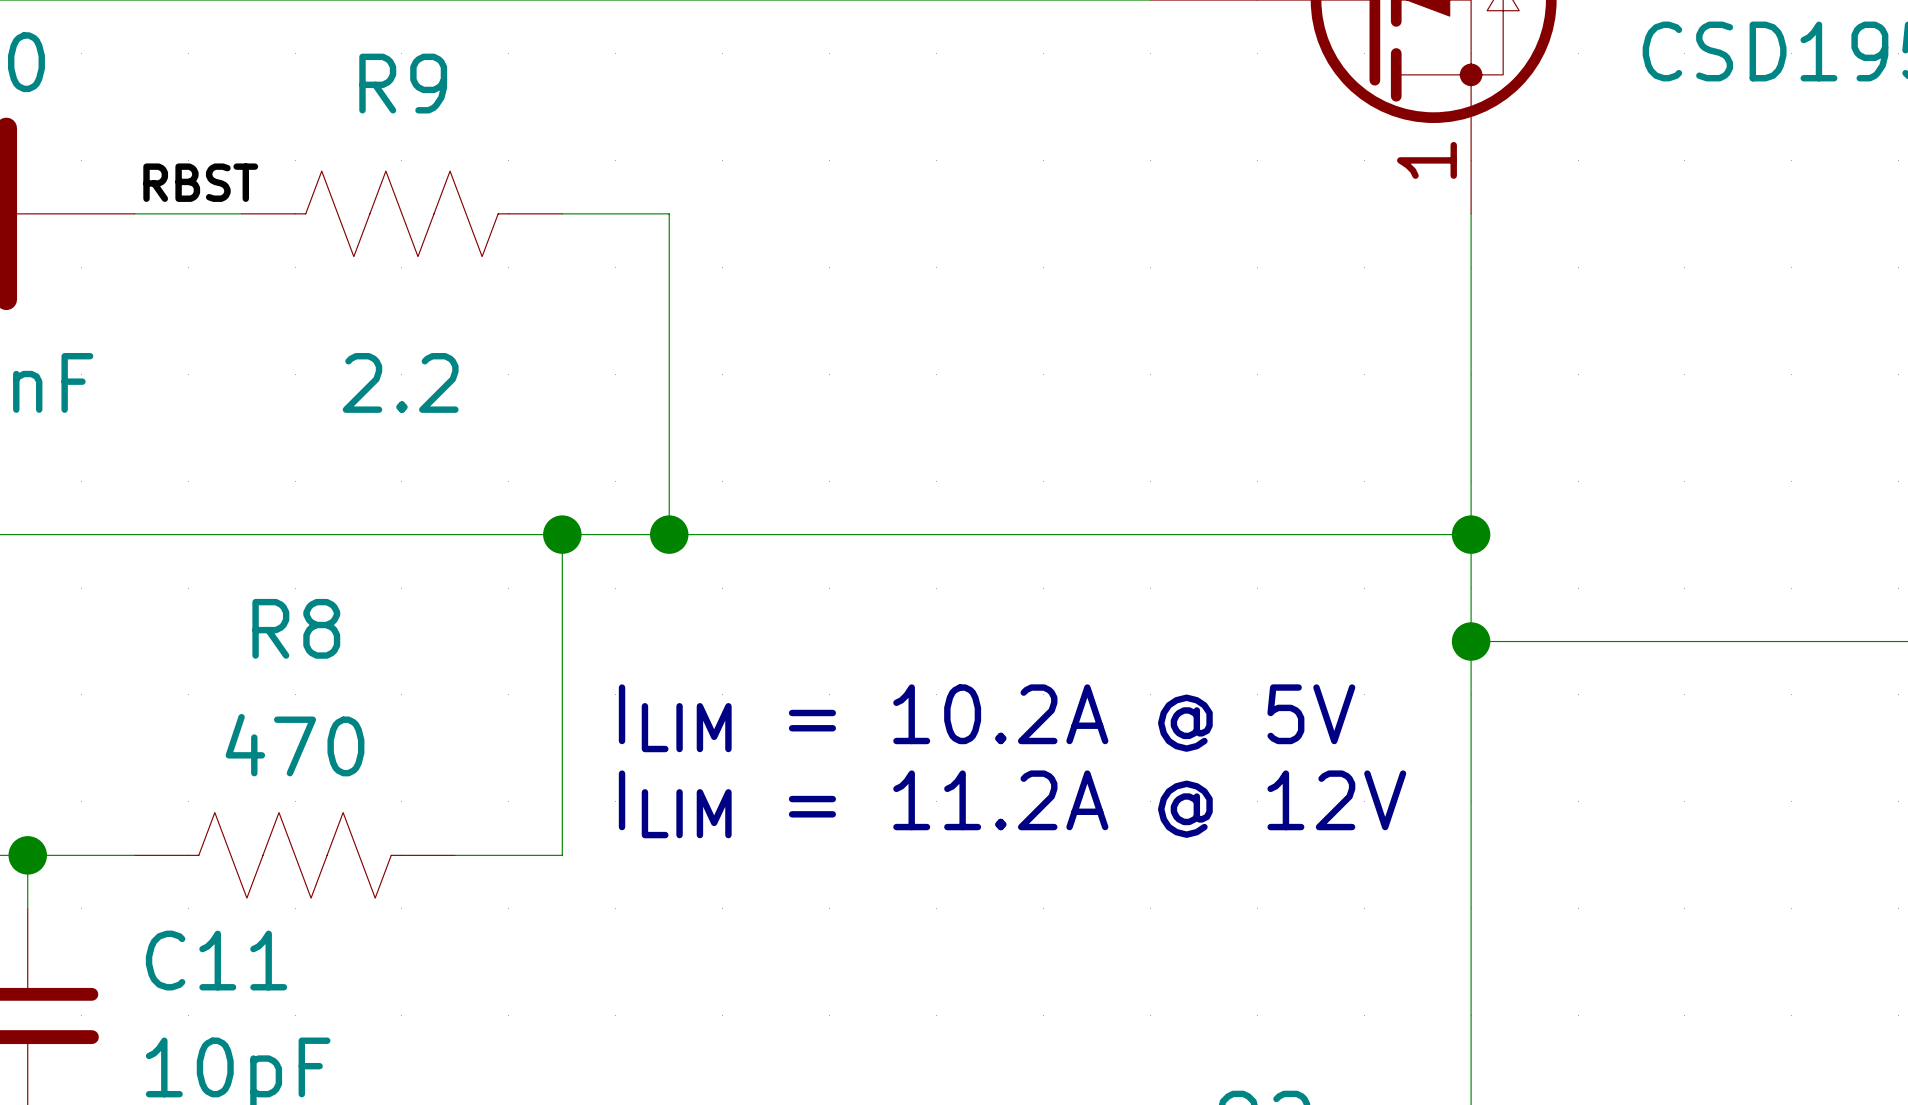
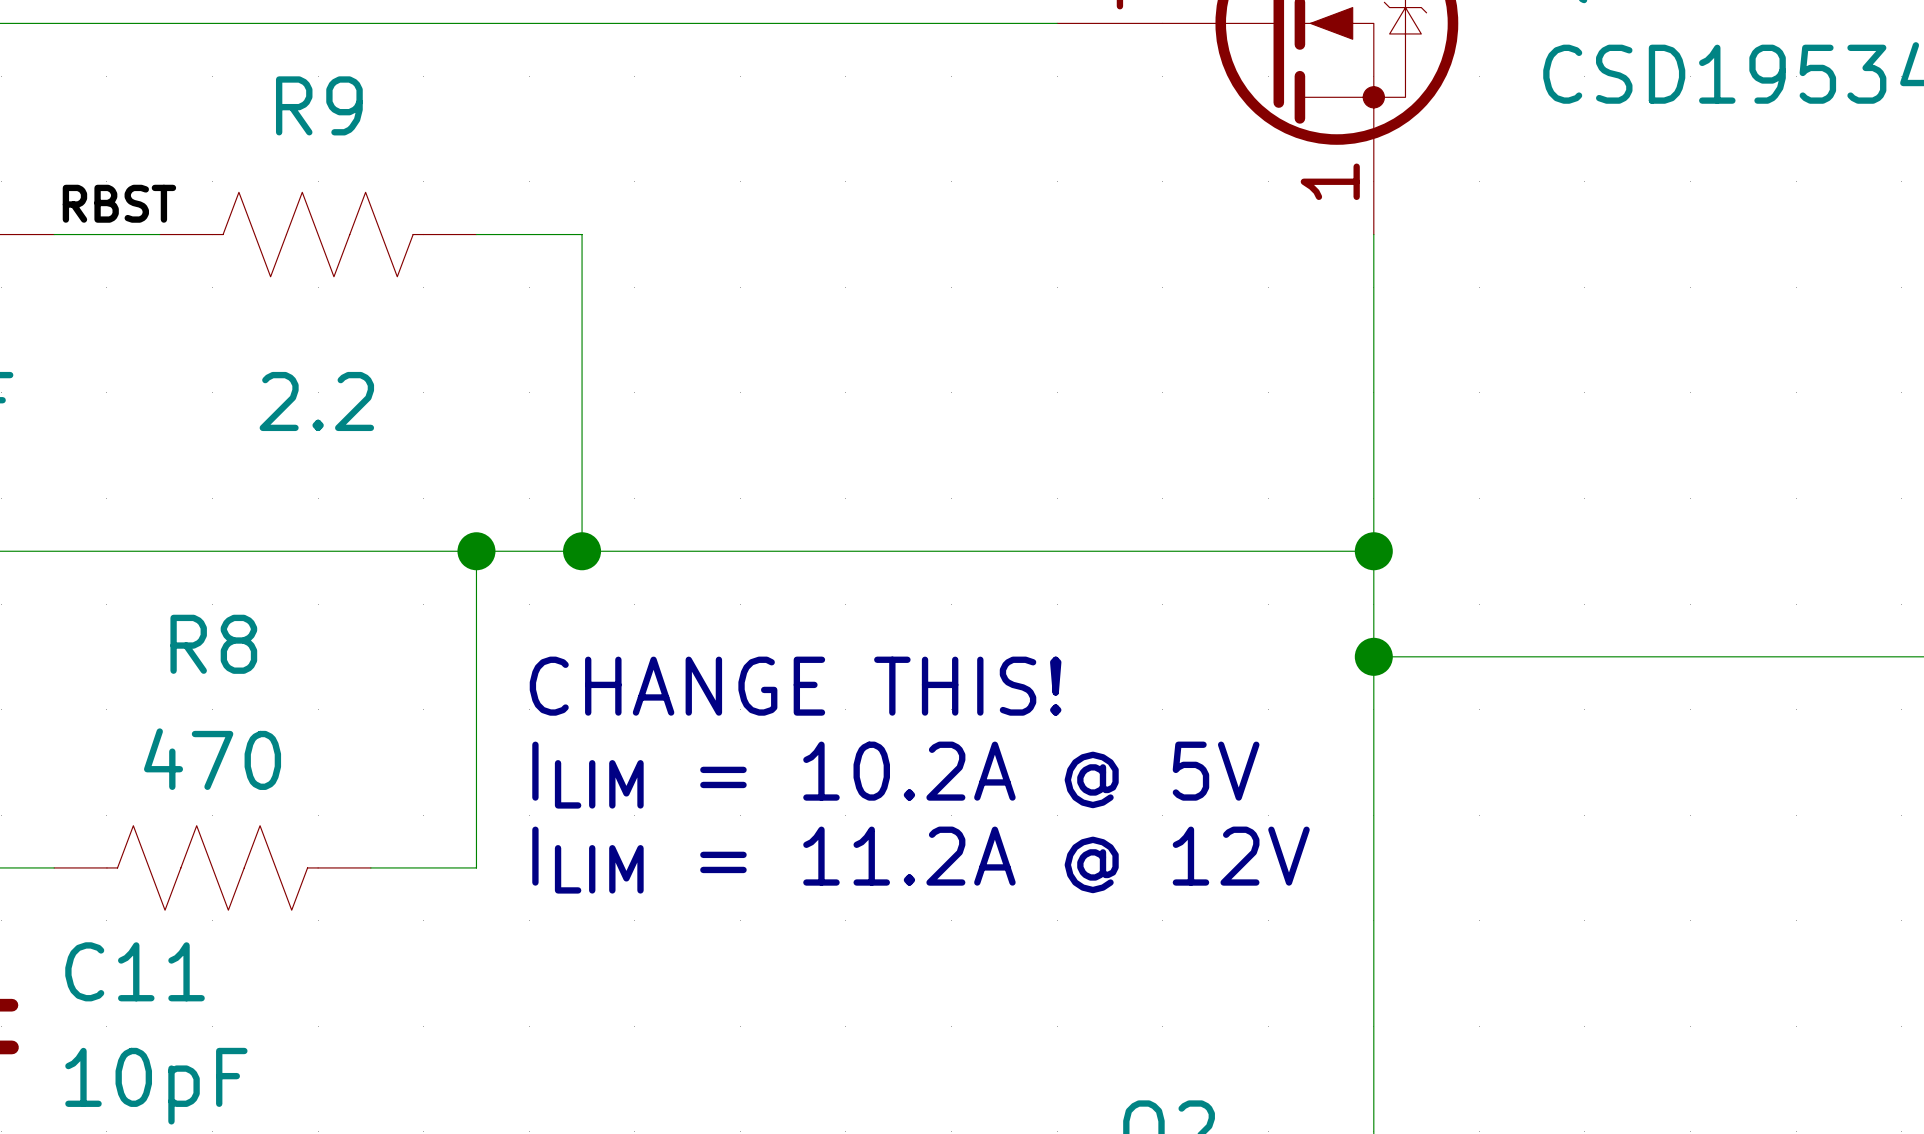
text: none -> CHANGE THIS! (795, 686)
text position: ILIM = 10.2A @ 5V (987, 718) -> ILIM = 10.2A @ 5V (895, 775)
text position: ILIM = 11.2A @ 12V (1012, 804) -> ILIM = 11.2A @ 12V (921, 860)

